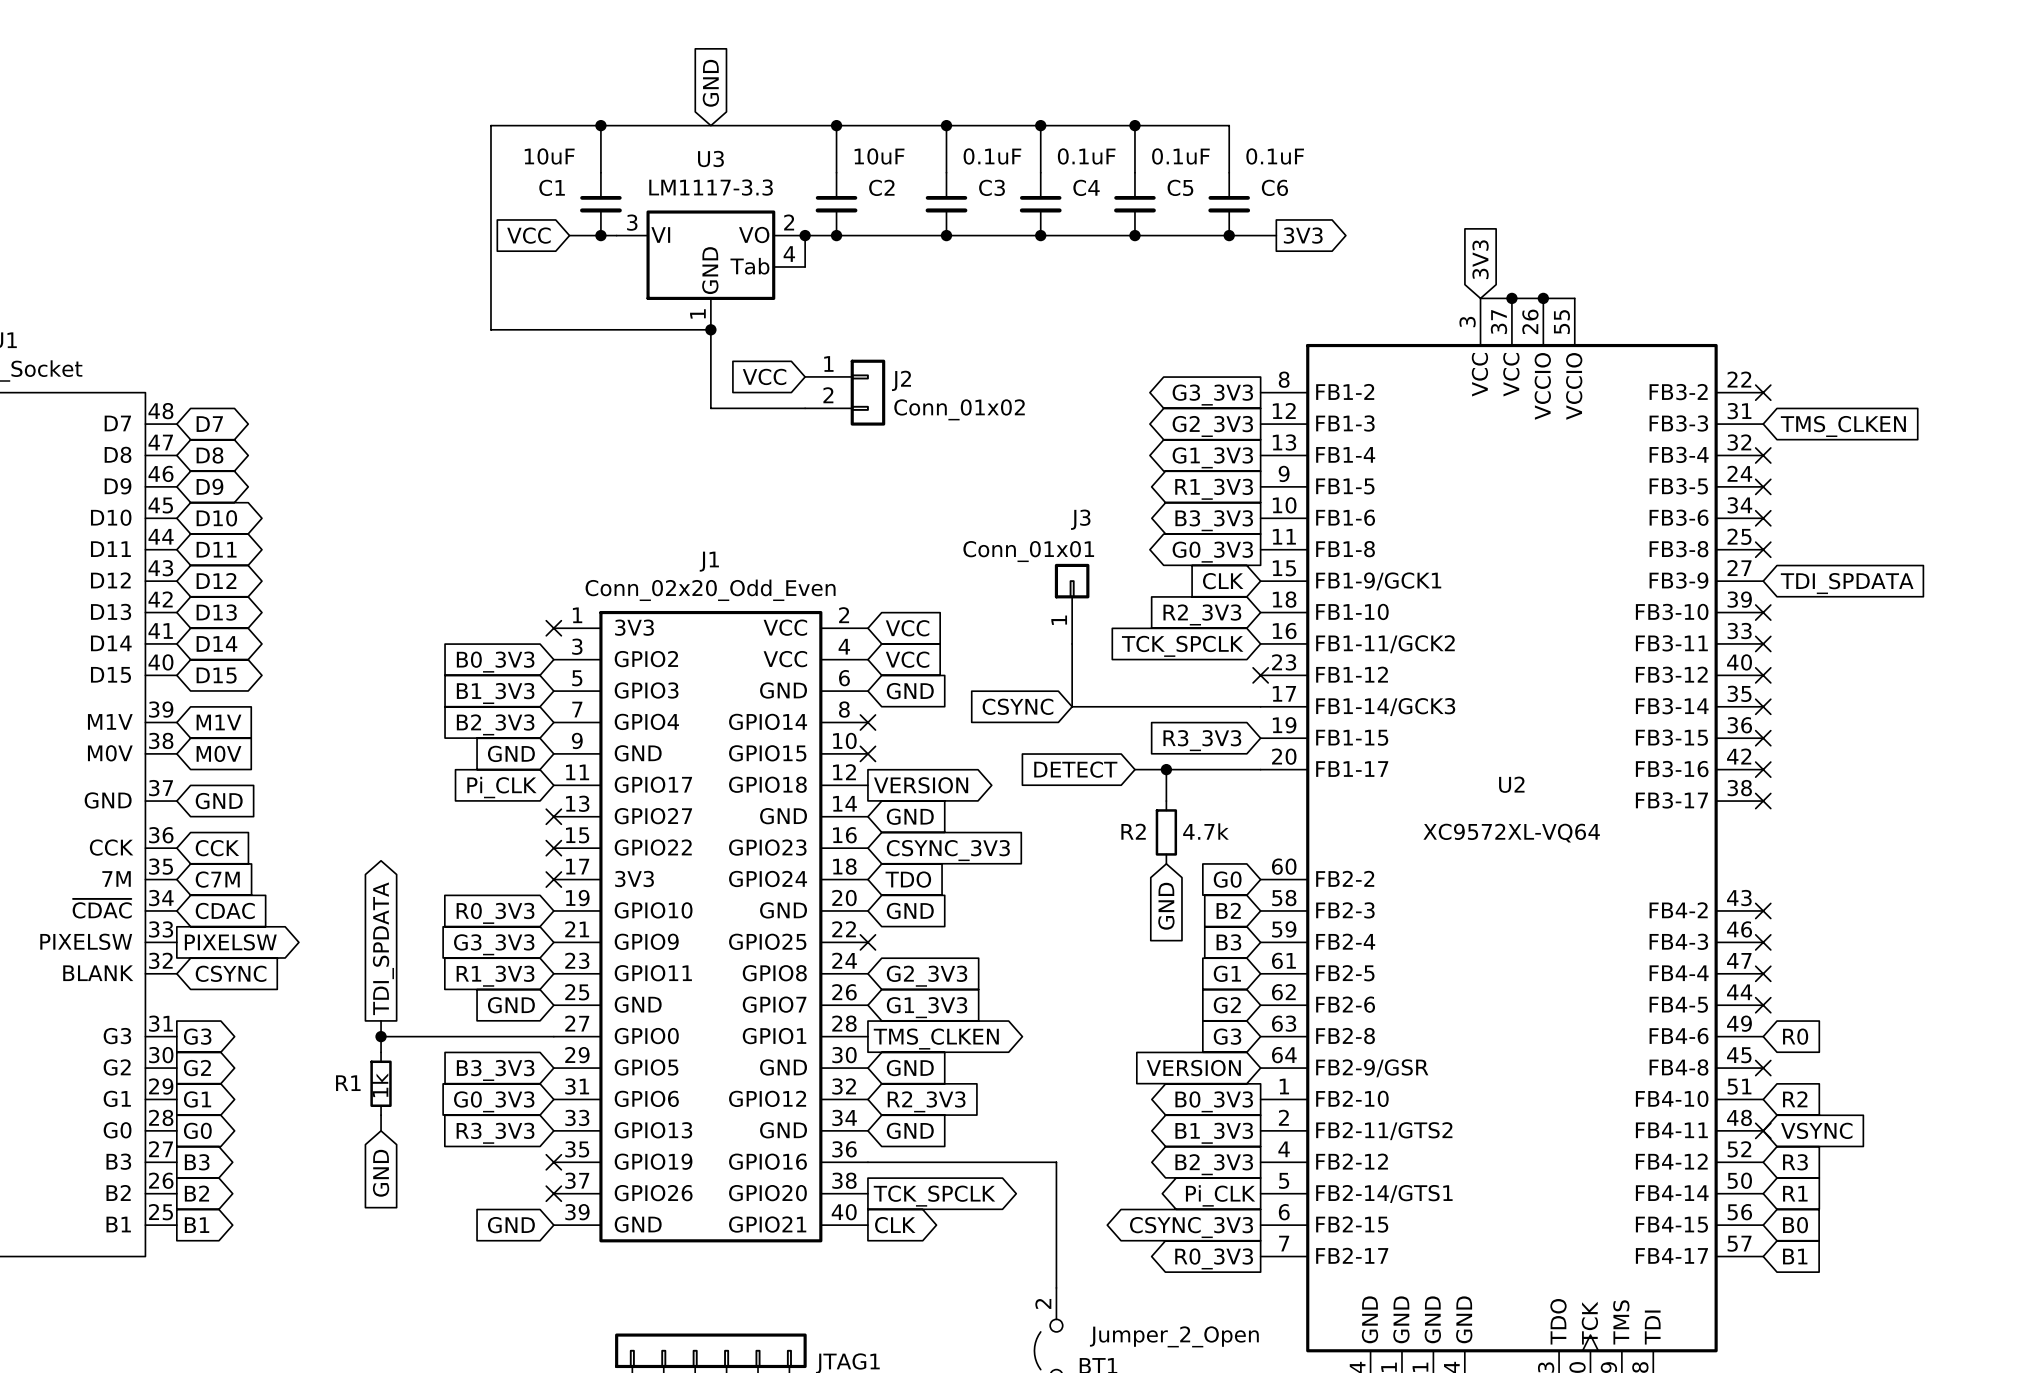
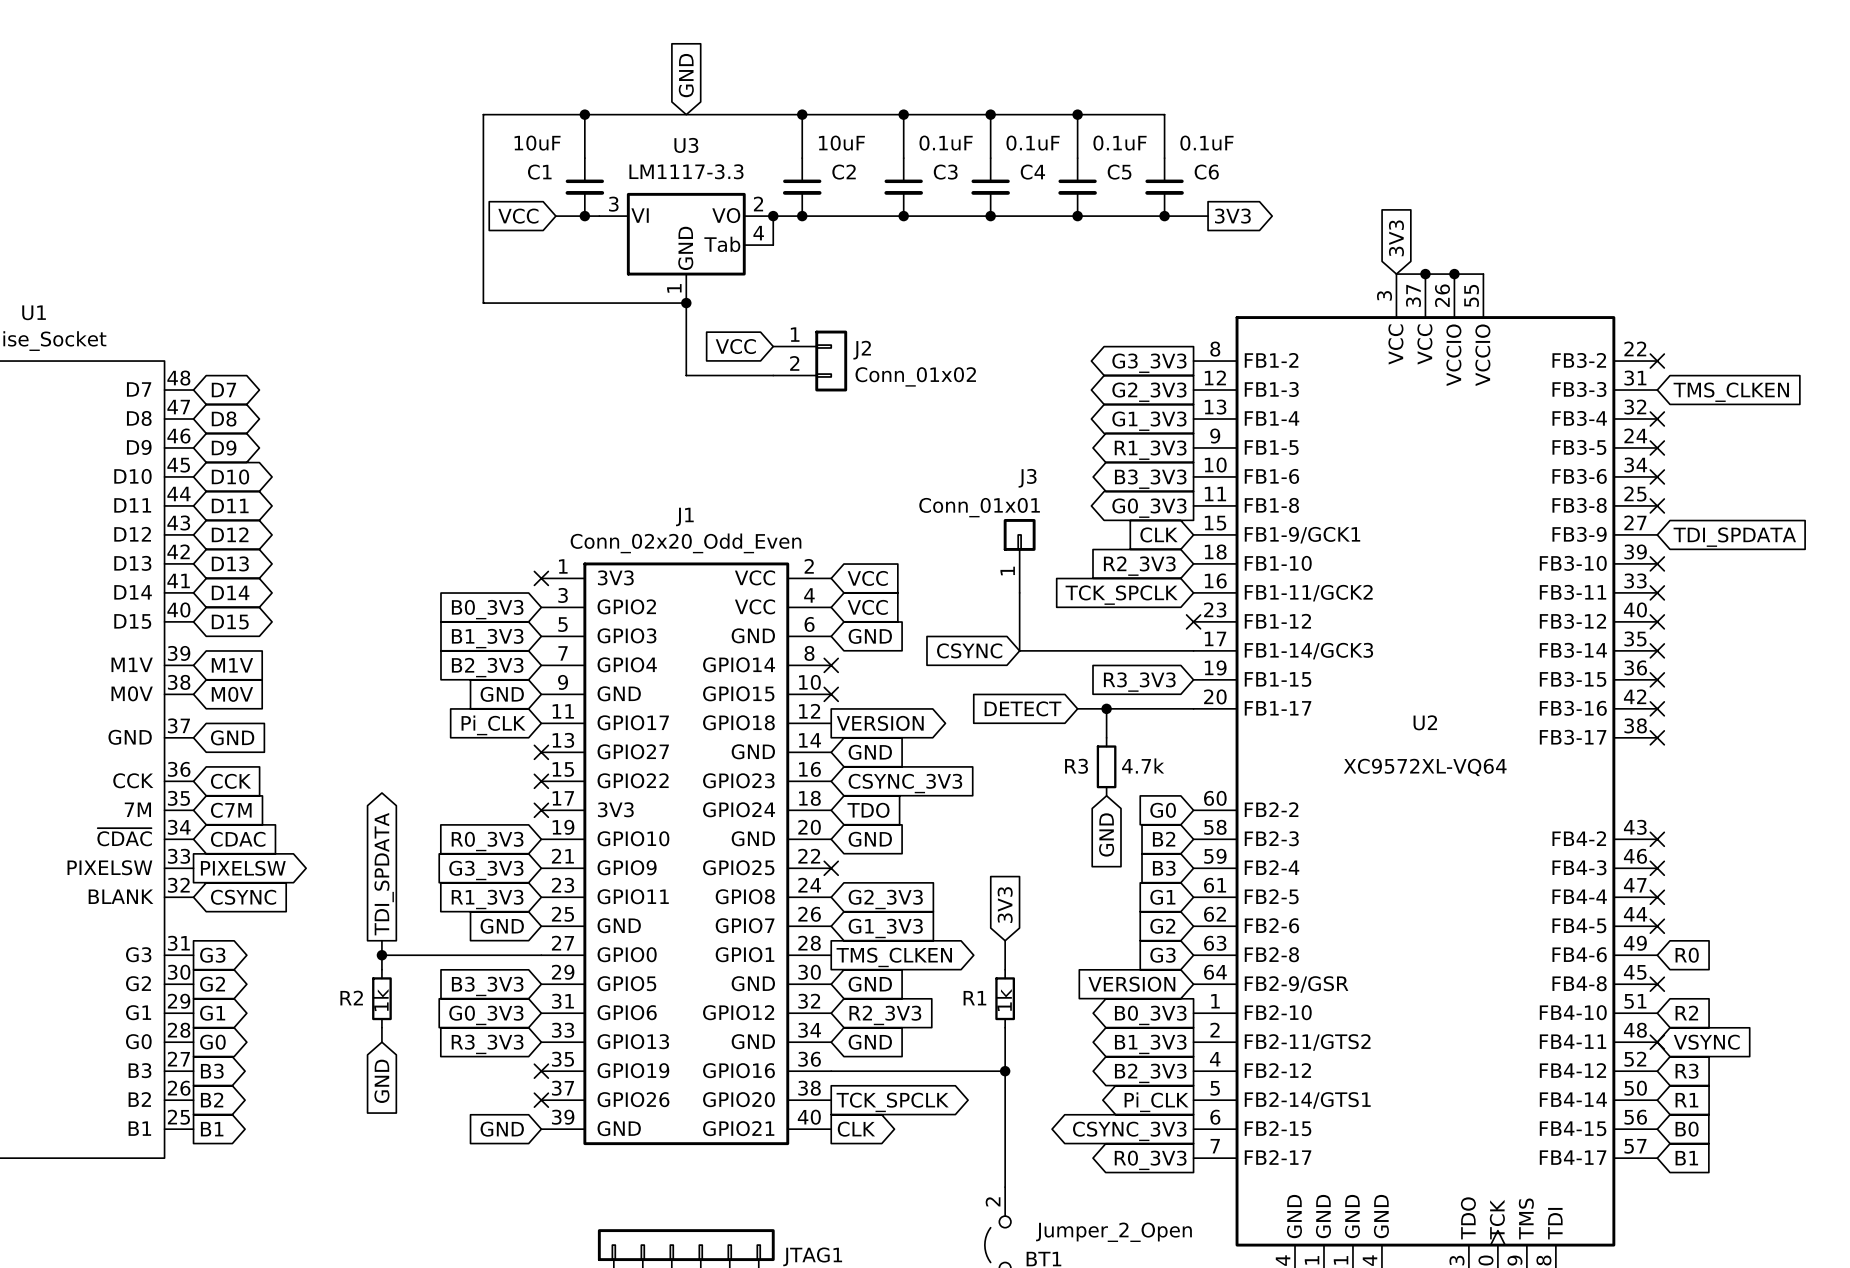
R2 name: R2 (1133, 831) -> R3 (1076, 766)
global label: none -> 3V3 (1005, 905)
wire: none -> (1005, 940) (1005, 969)
R1 name: R1 (348, 1083) -> R2 (351, 998)
R1: none -> 1k (1005, 998)
wire: none -> (1005, 1027) (1005, 1071)
junction: none -> (1005, 1071)

